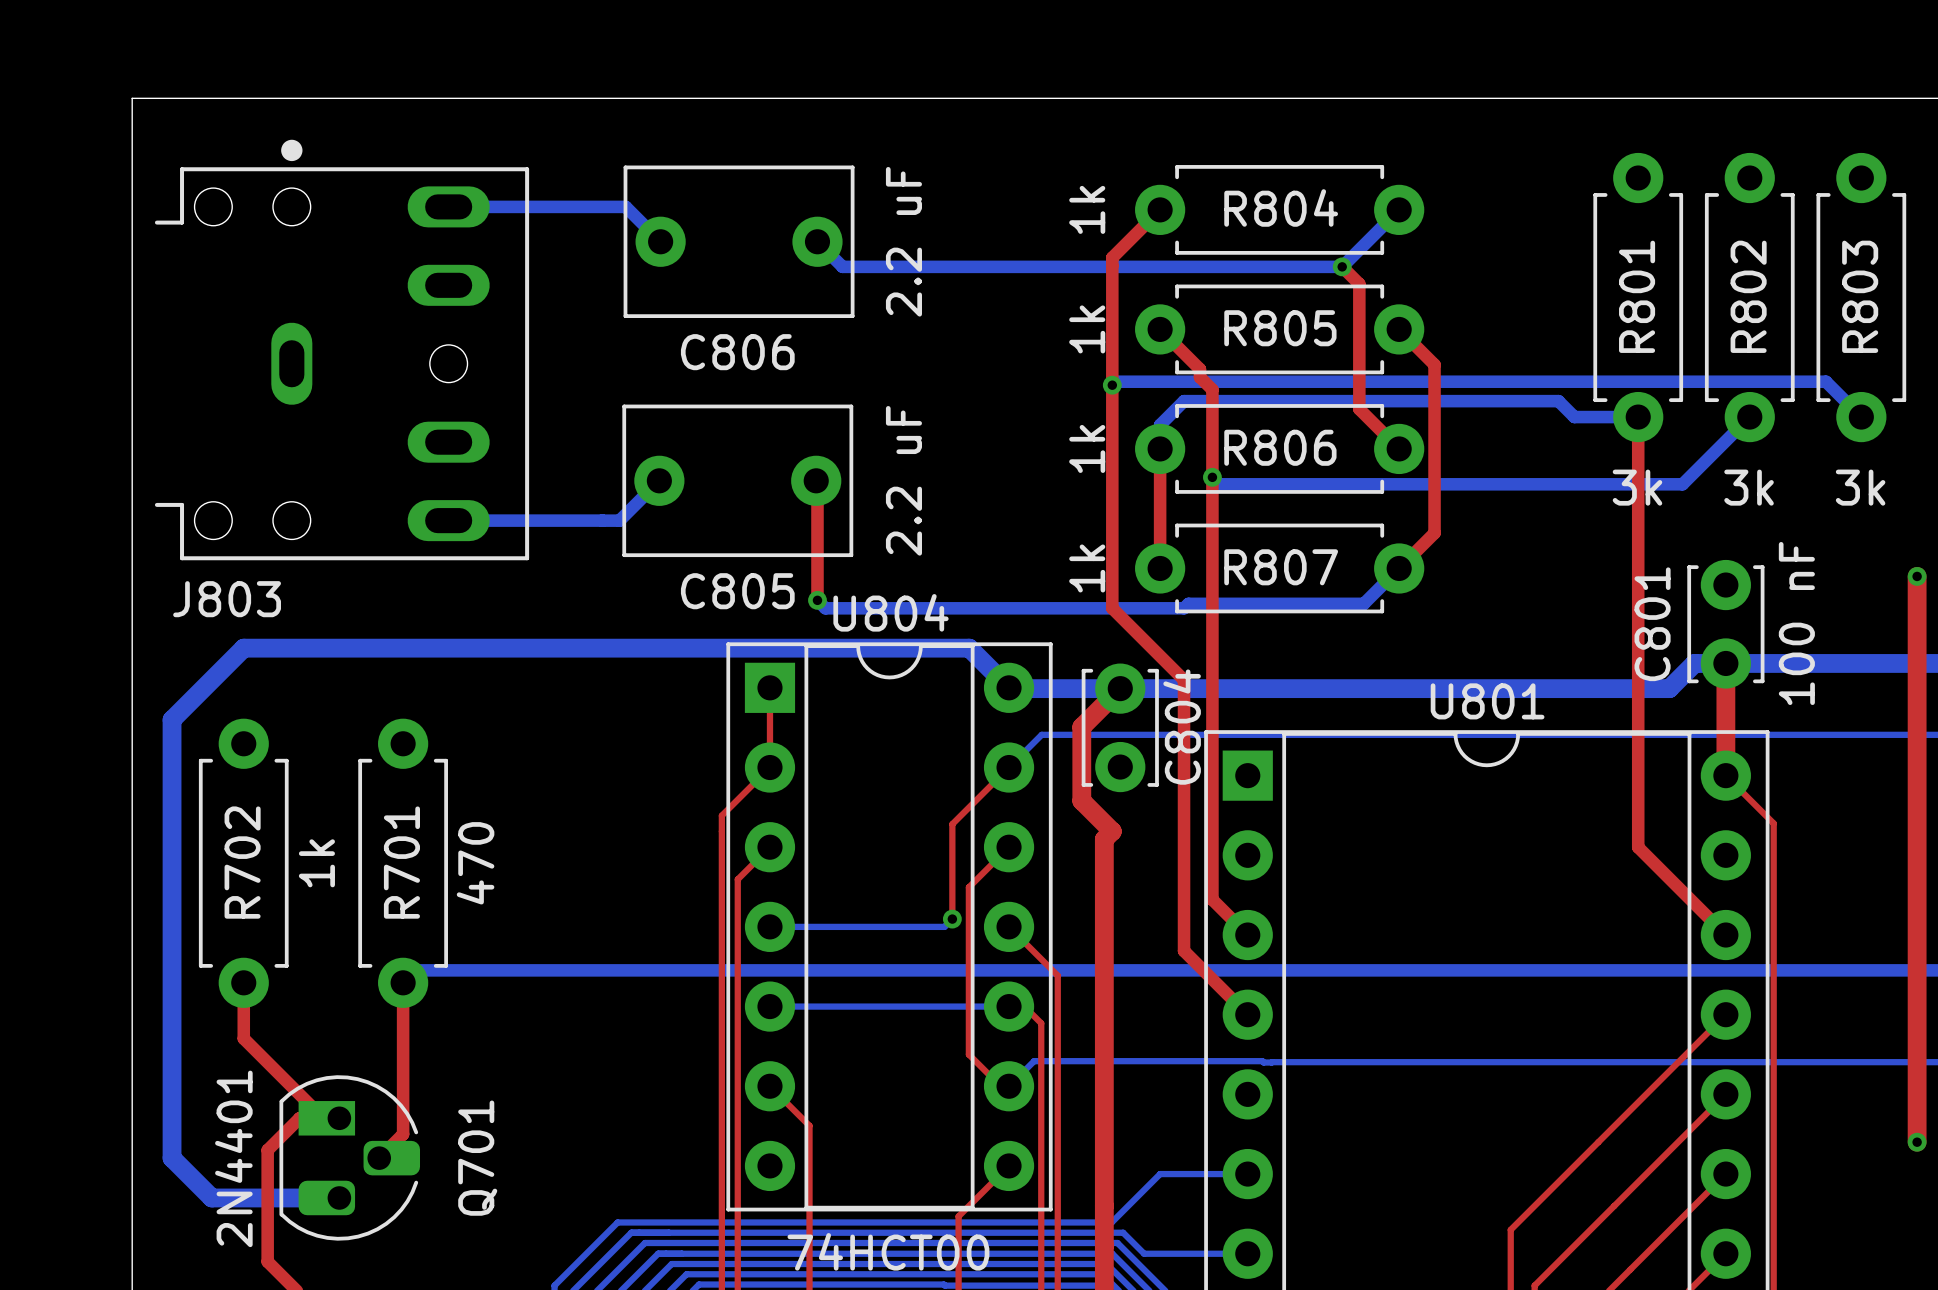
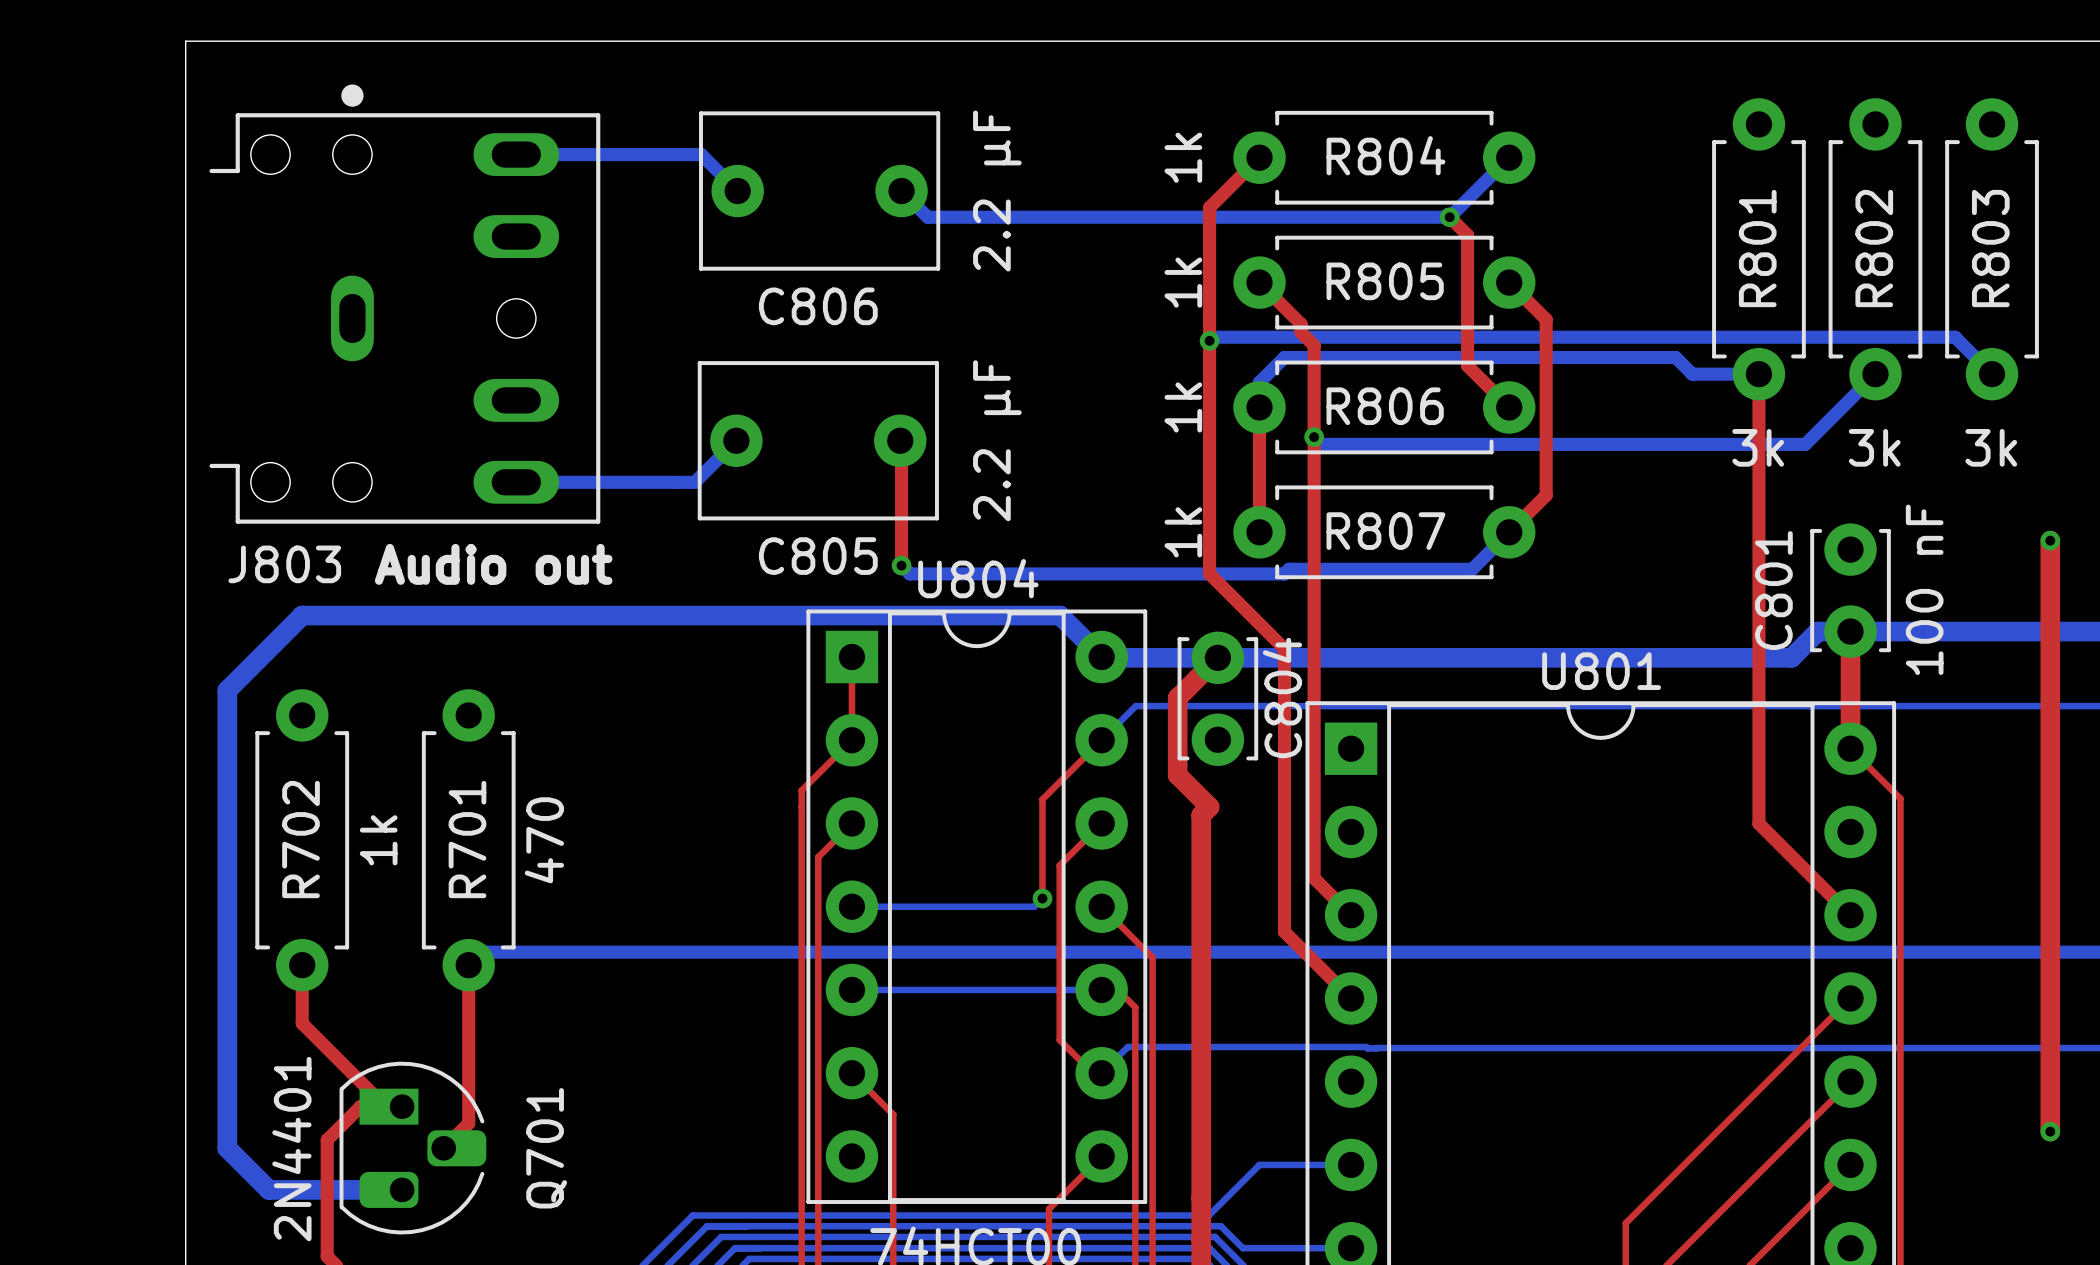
C806 value: 2.2 uF (903, 241) -> 2.2 μF (997, 191)
C805 value: 2.2 uF (903, 480) -> 2.2 μF (997, 440)
text: none -> Audio out (493, 564)

